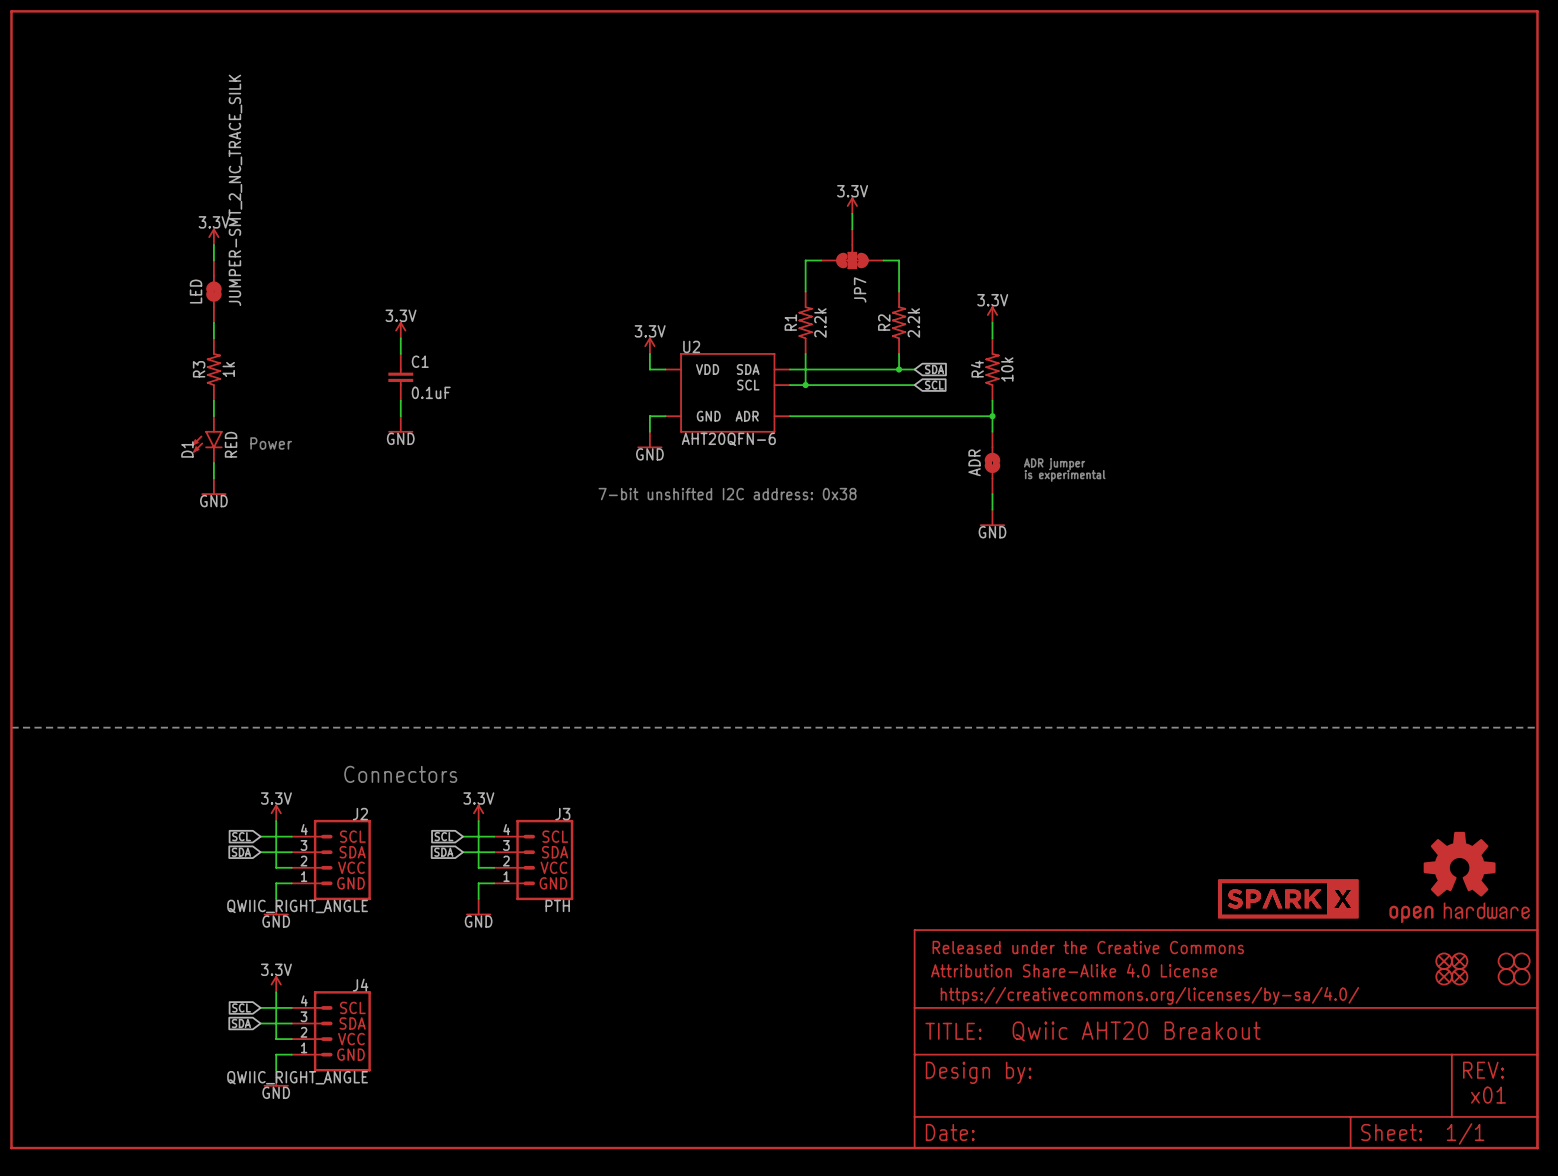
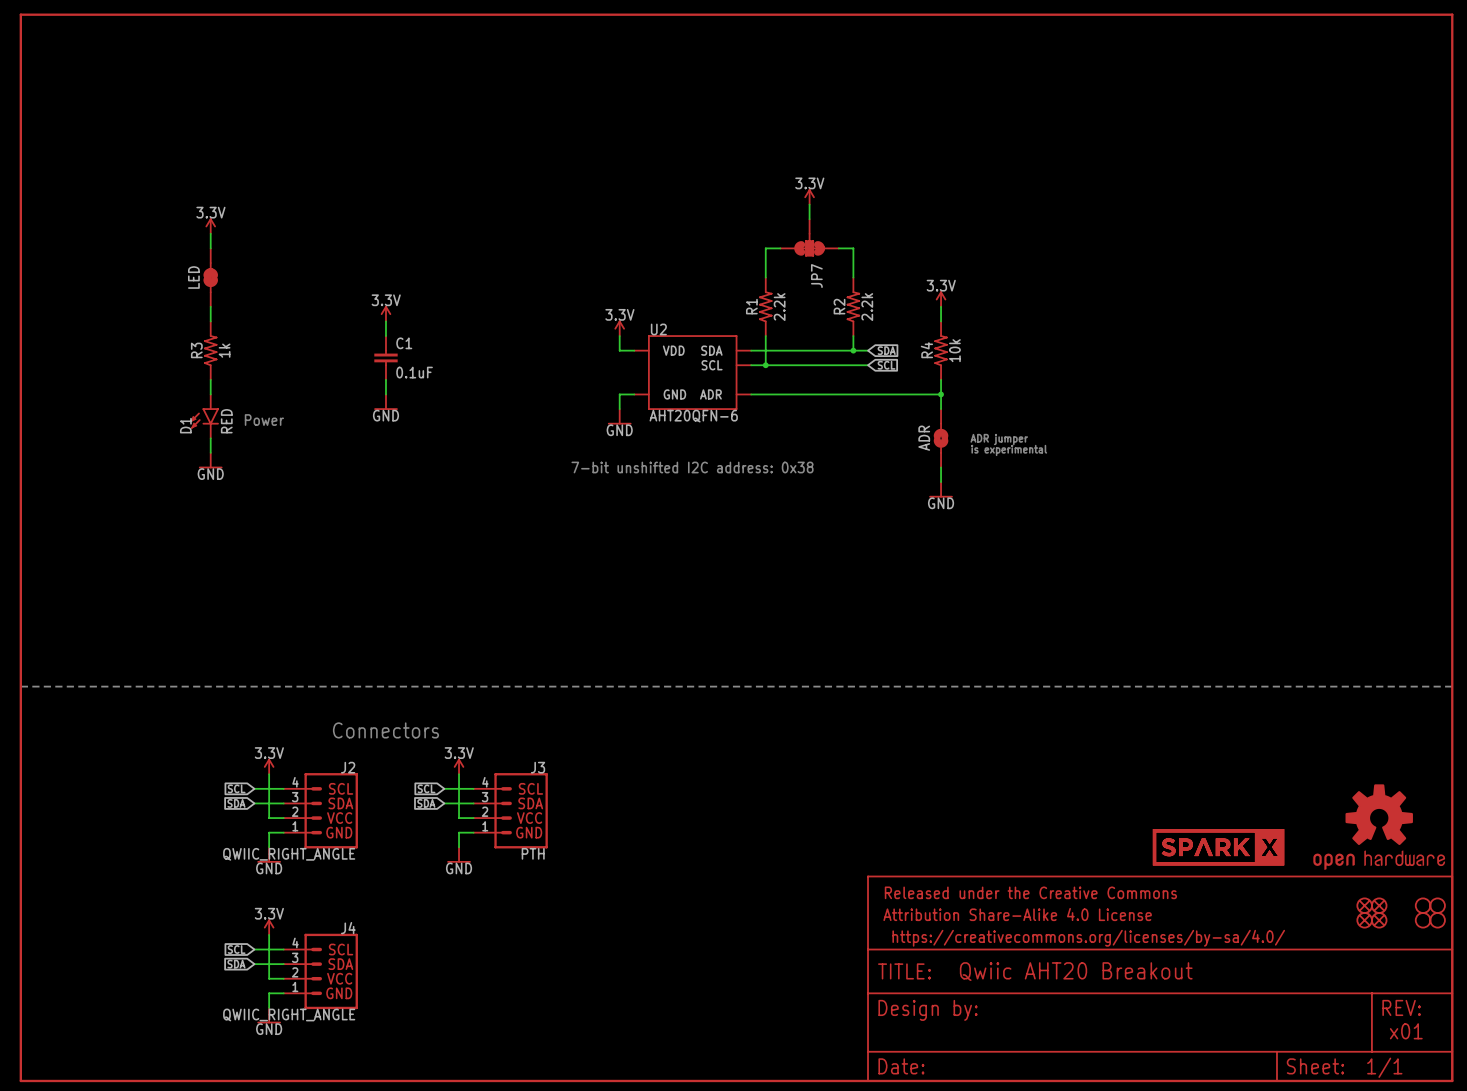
LED value: JUMPER-SMT_2_NC_TRACE_SILK (235, 190) -> none

